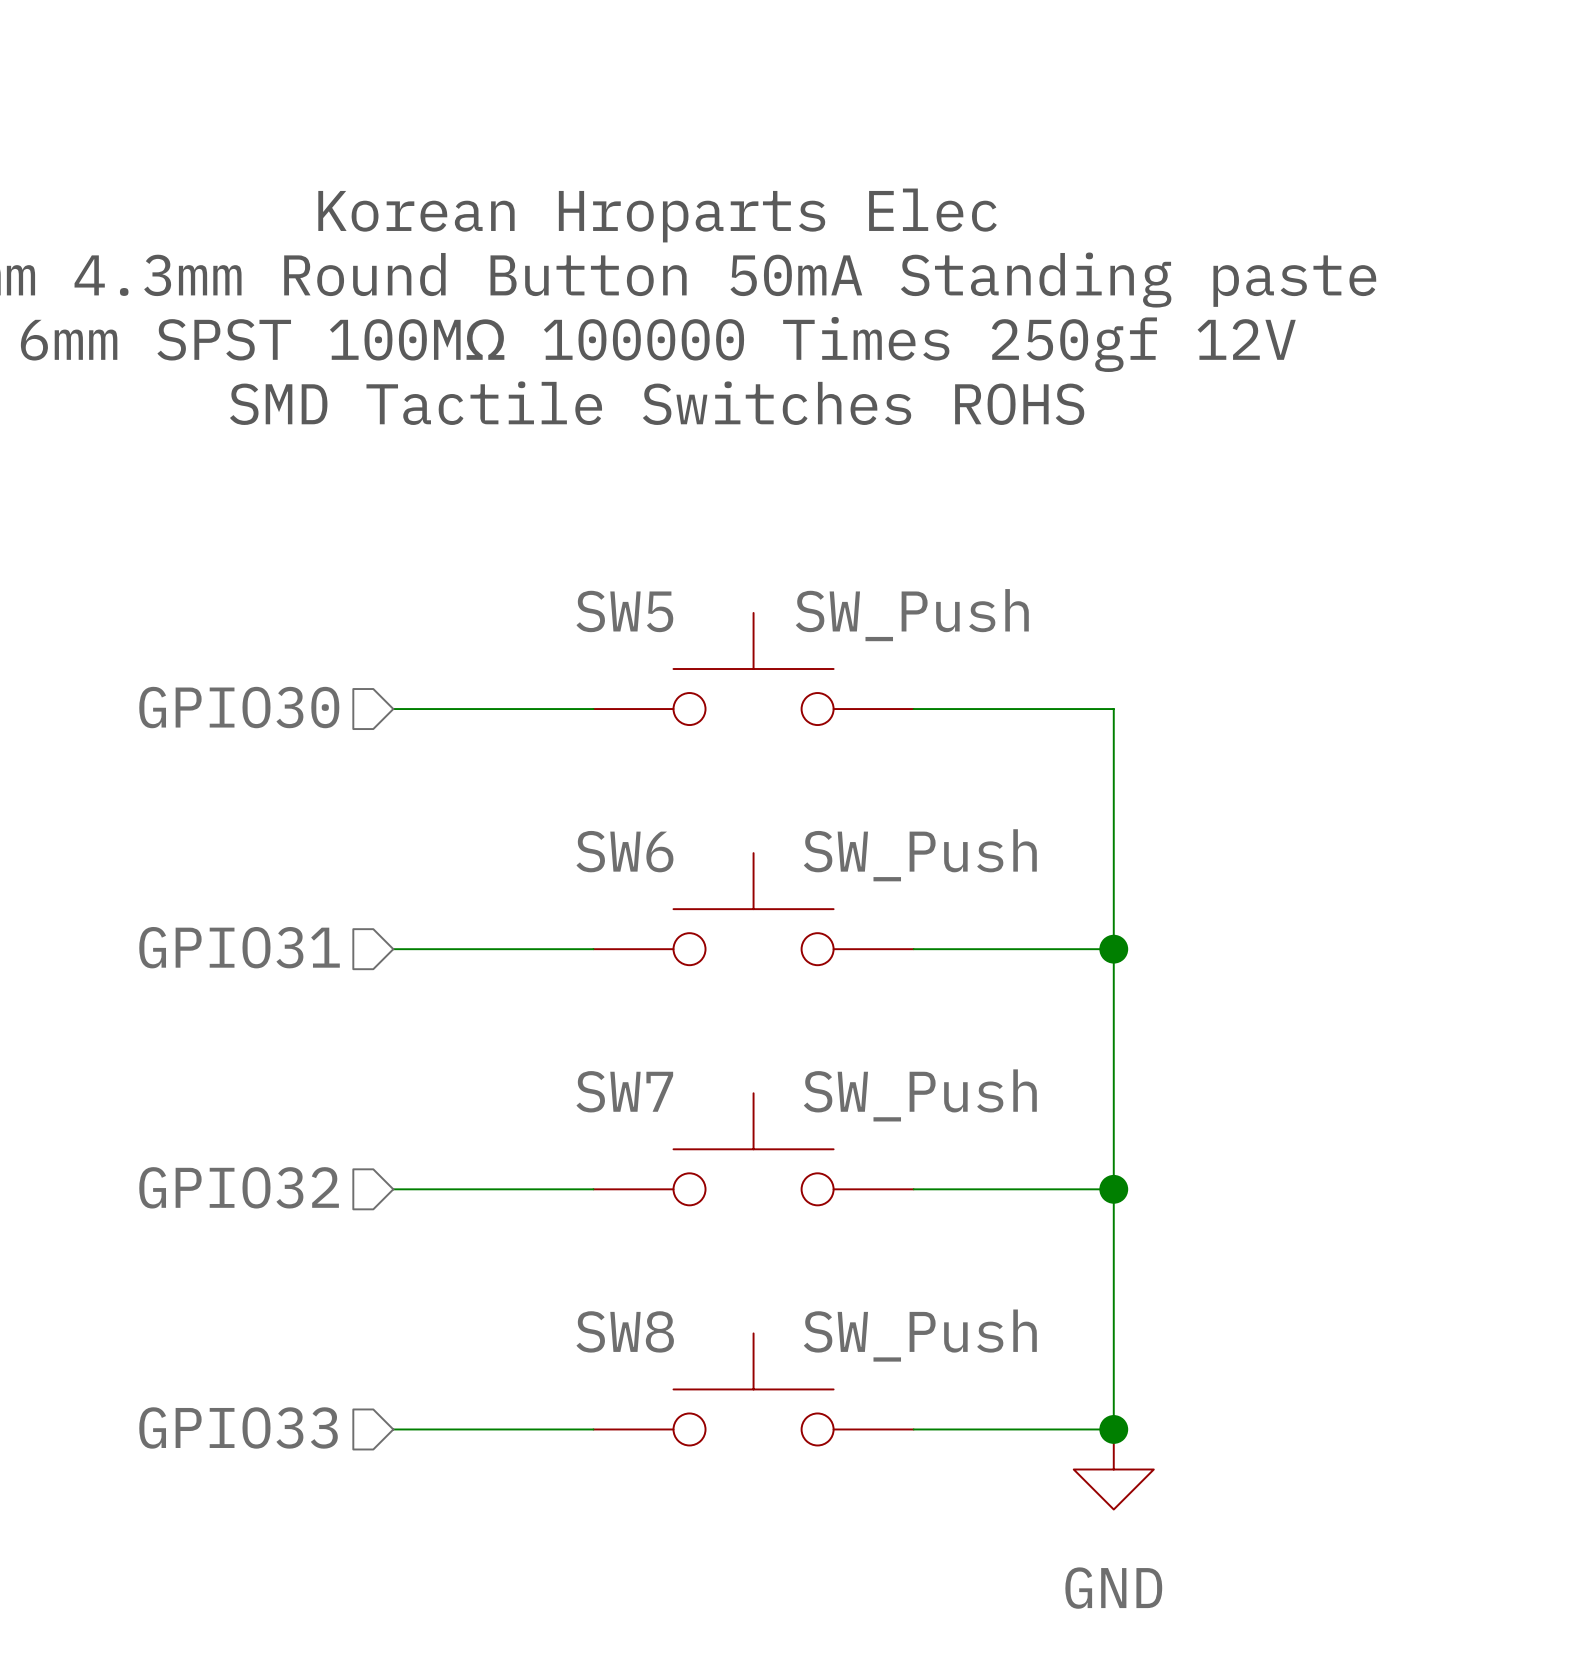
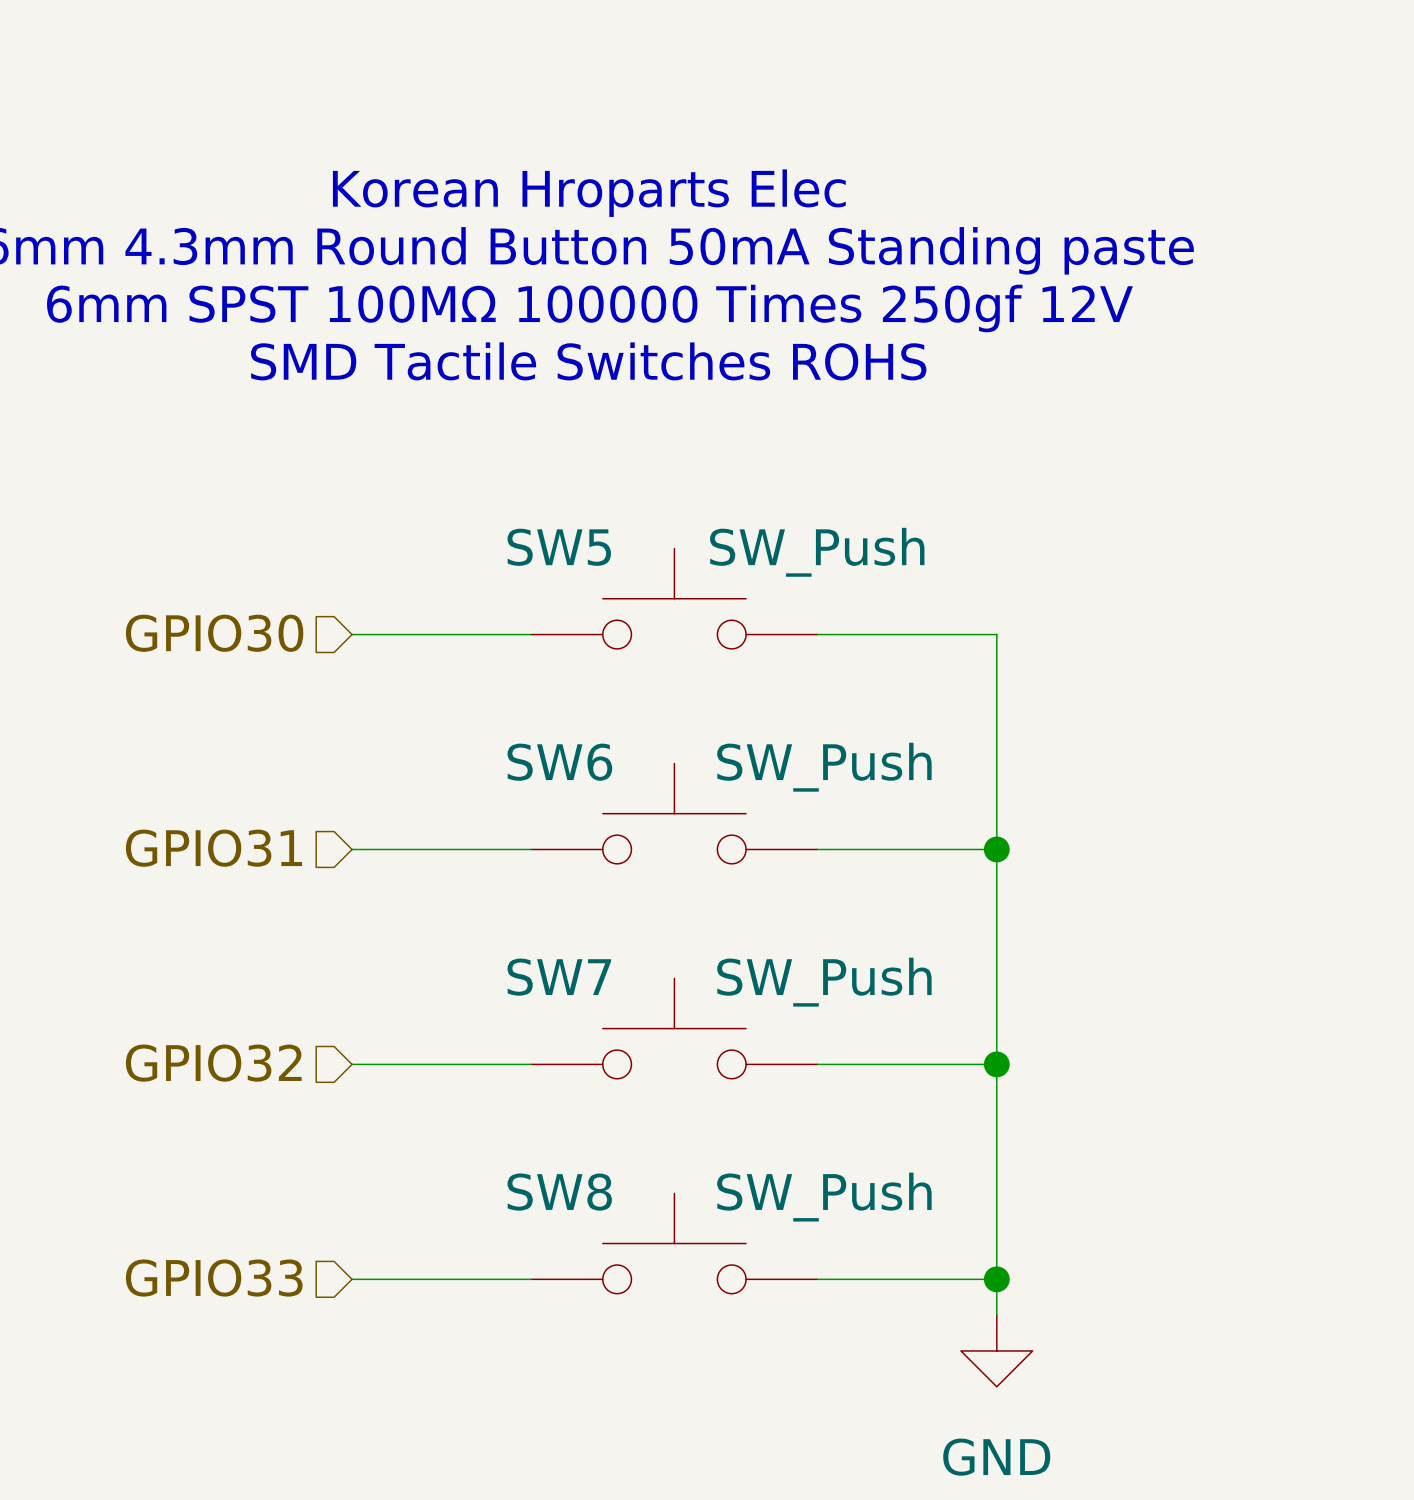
power symbol position: GND (1113, 1469) -> GND (996, 1350)

